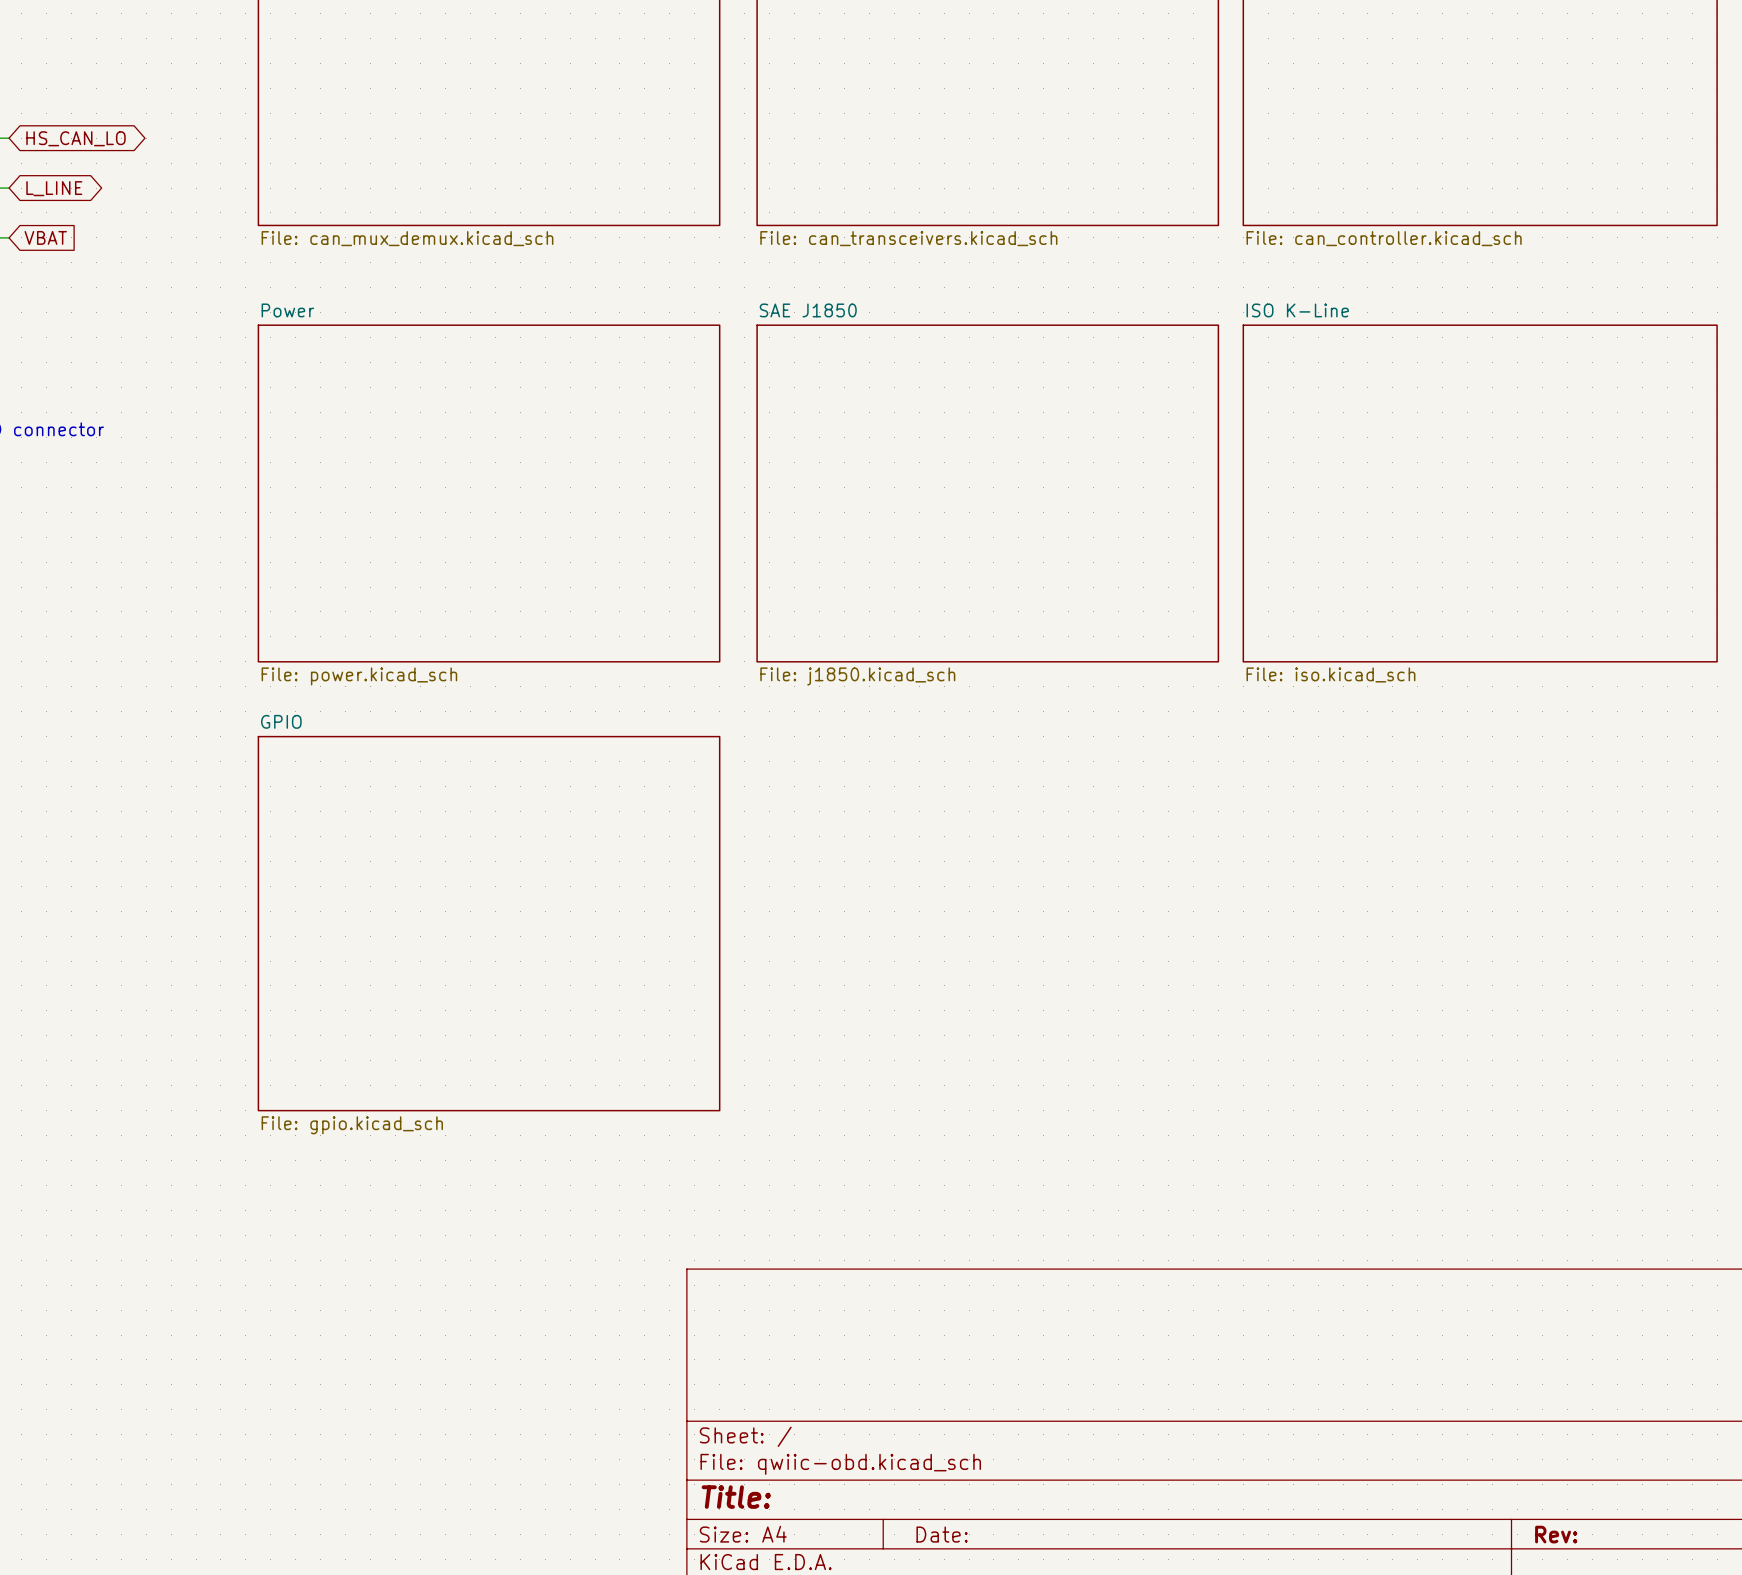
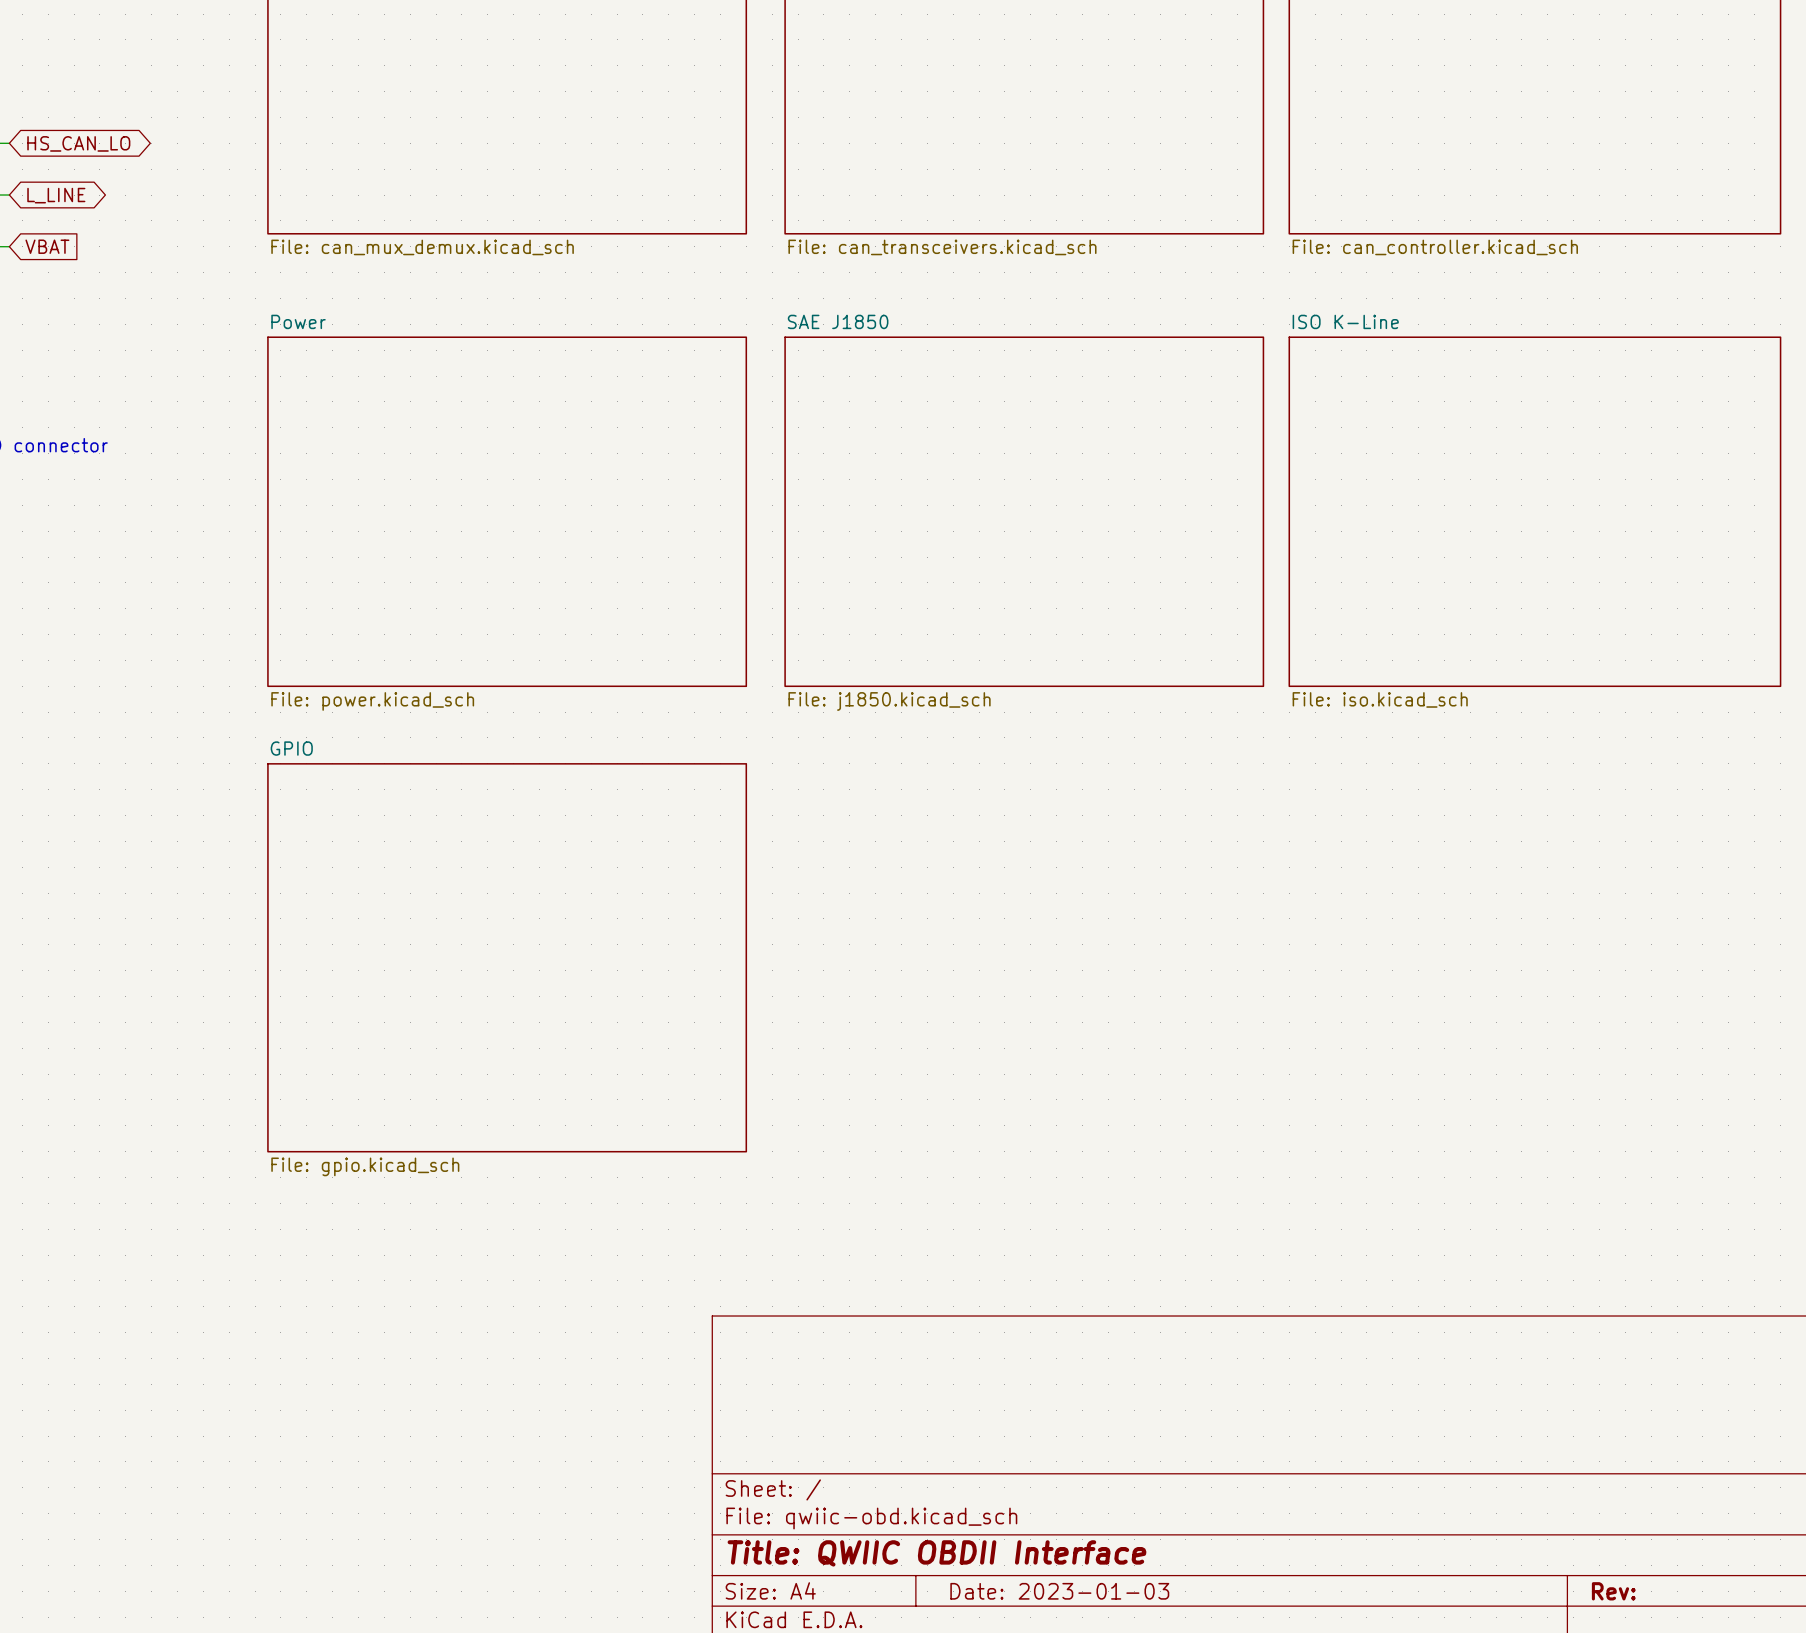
title block: Title: (736, 1497) -> Title: QWIIC OBDII Interface (936, 1553)
title block: Date: (942, 1534) -> Date: 2023-01-03 (1059, 1591)

